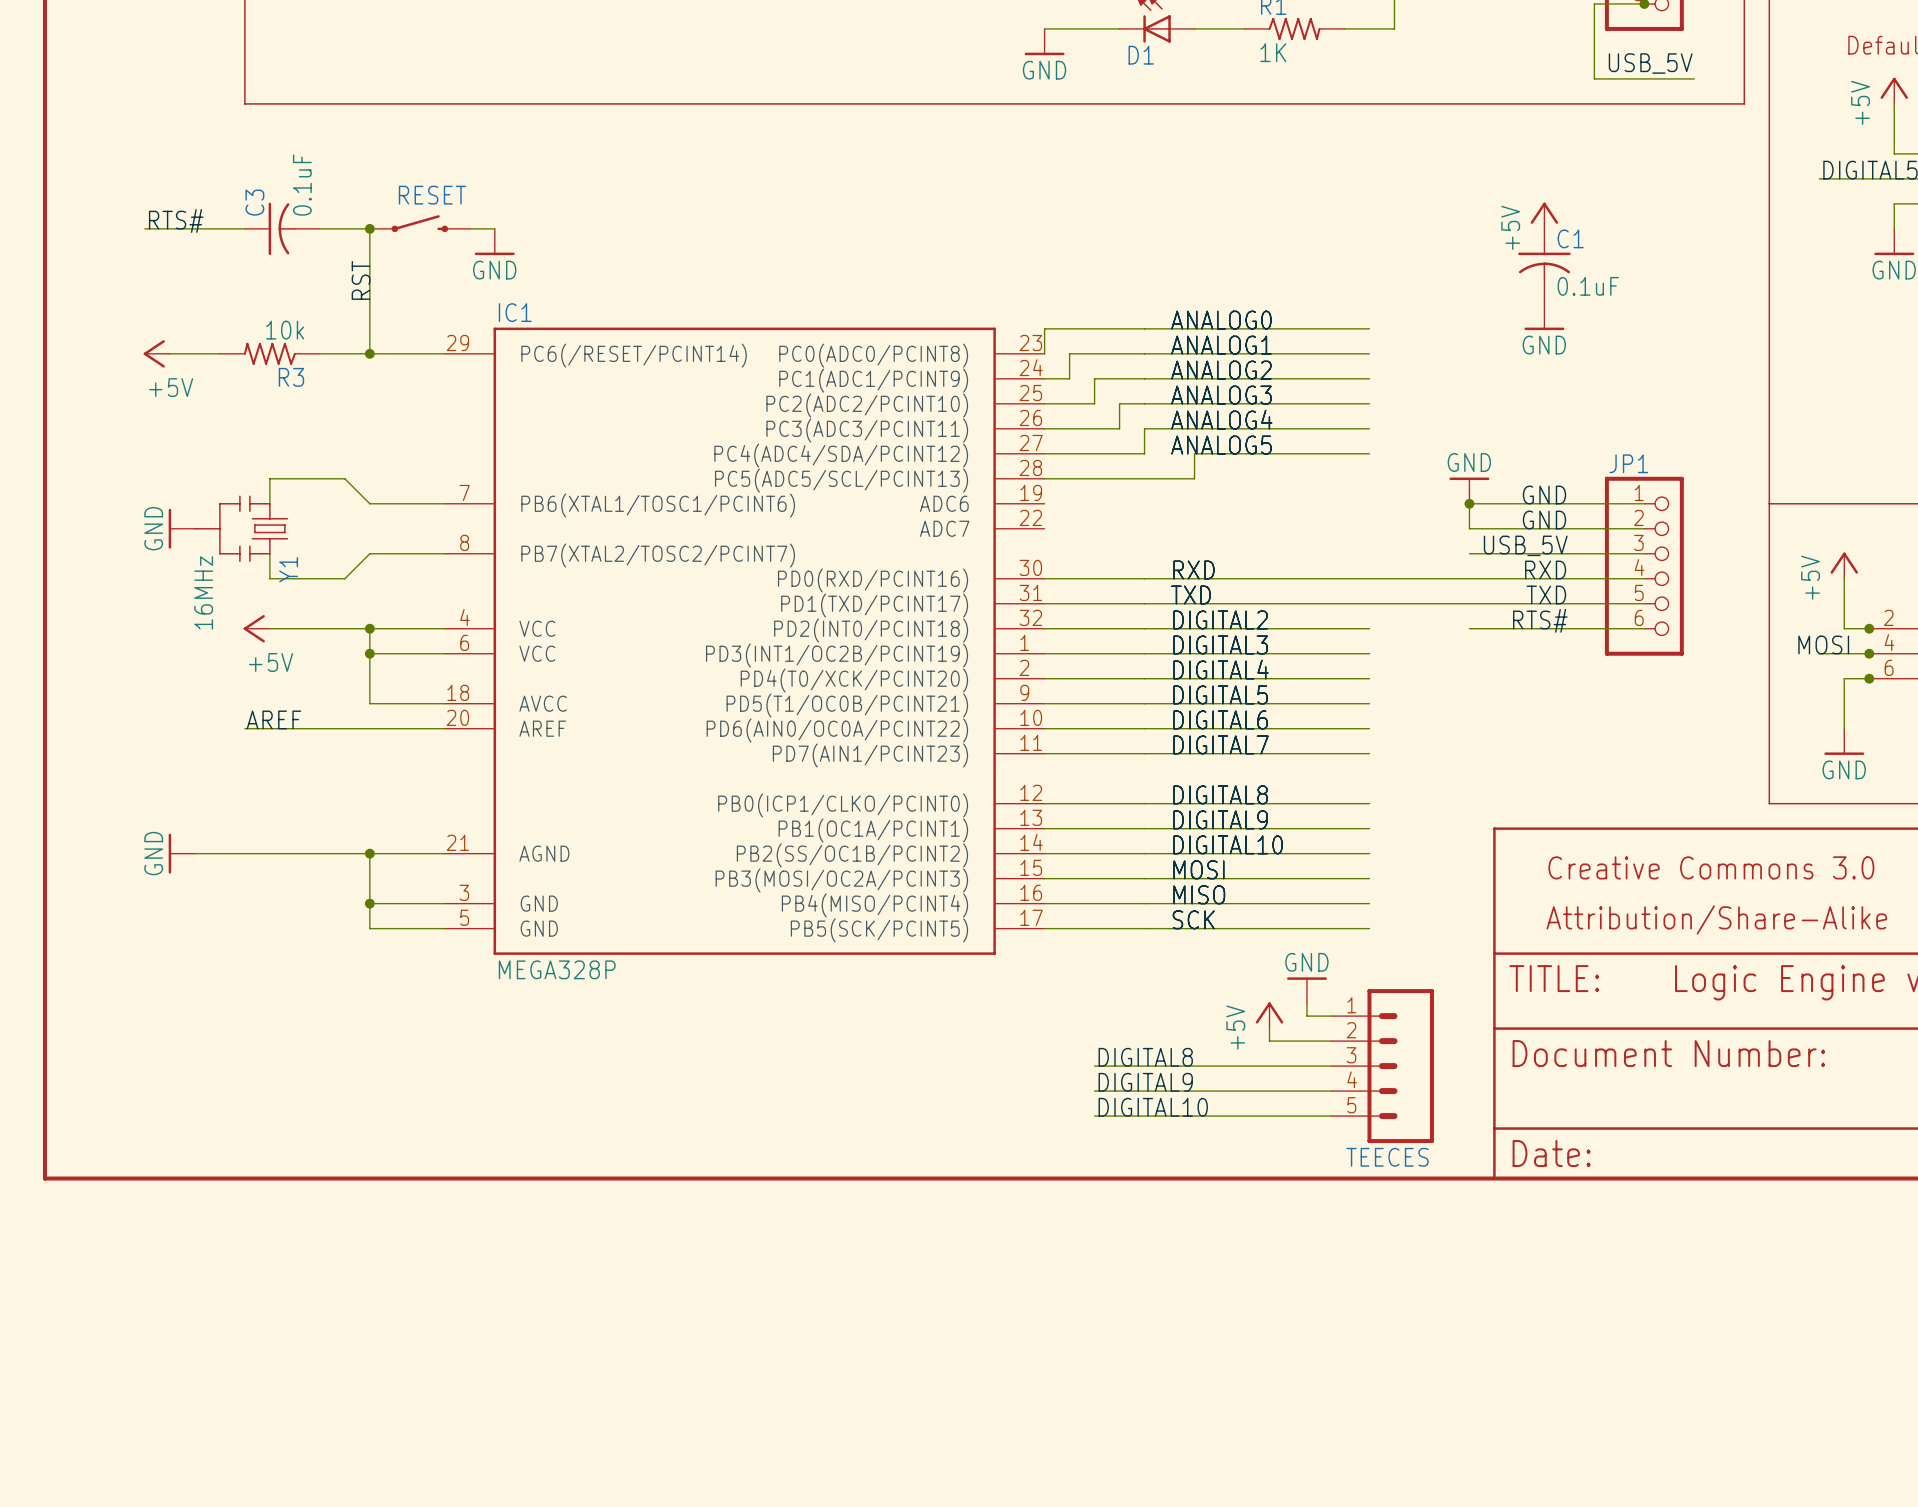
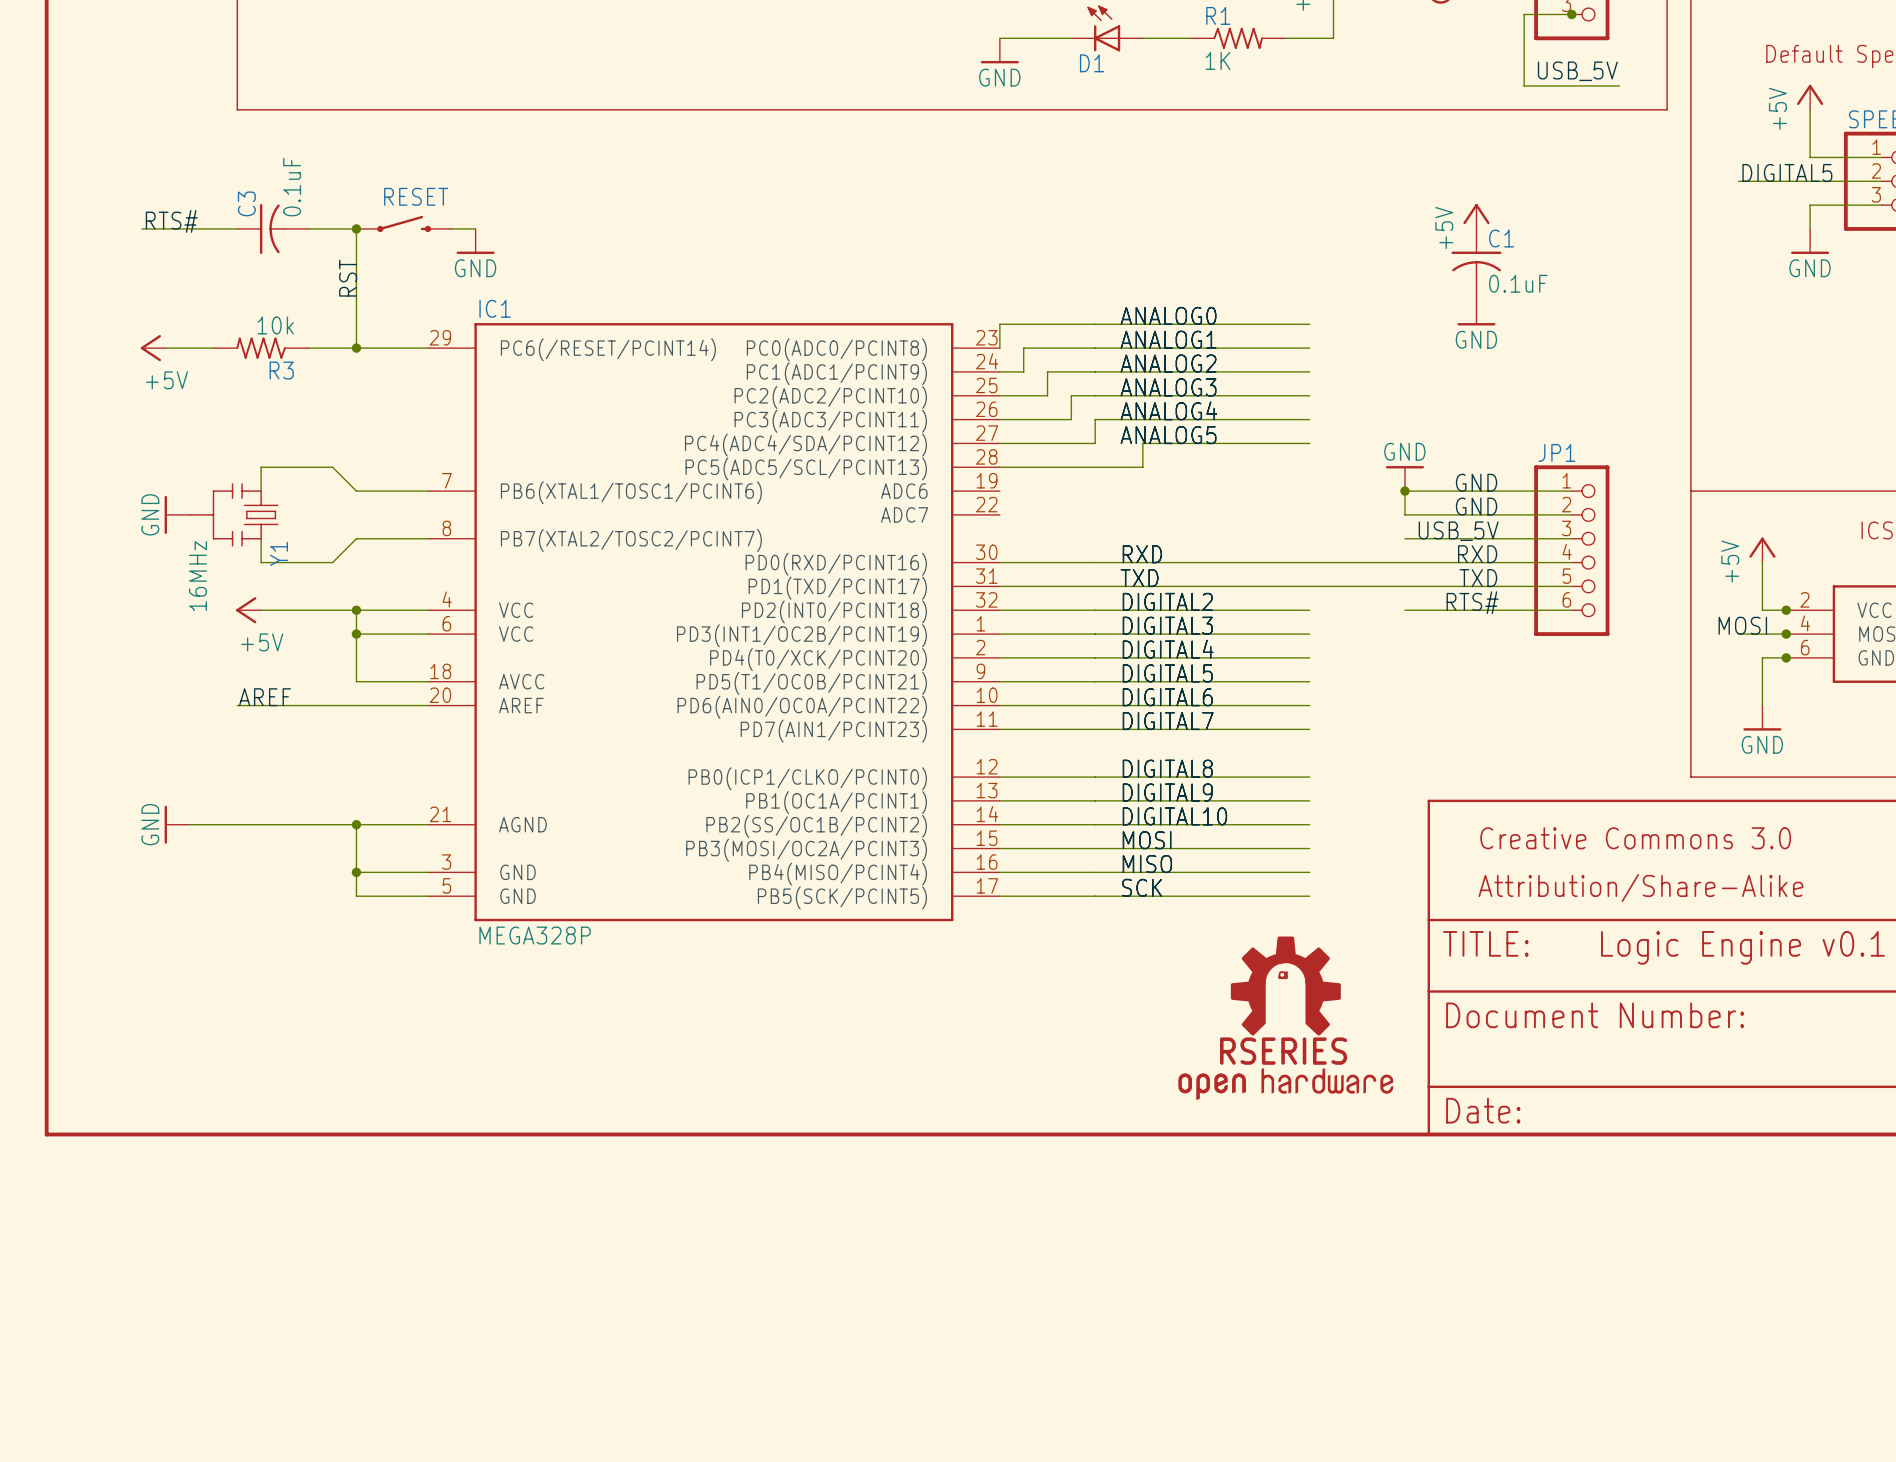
power symbol: GND (1306, 990) -> none
power symbol: +5V (1269, 1015) -> none
wire: (1269, 1028) (1269, 1041) (1331, 1041) -> none
part: none -> (1285, 1018)
label: DIGITAL8 (1145, 1057) -> none
wire: (1094, 1066) (1331, 1066) -> none
TEECES: (1382, 1066) -> none
label: DIGITAL9 (1145, 1082) -> none
wire: (1094, 1091) (1331, 1091) -> none
label: DIGITAL10 (1153, 1107) -> none
wire: (1094, 1116) (1331, 1116) -> none

